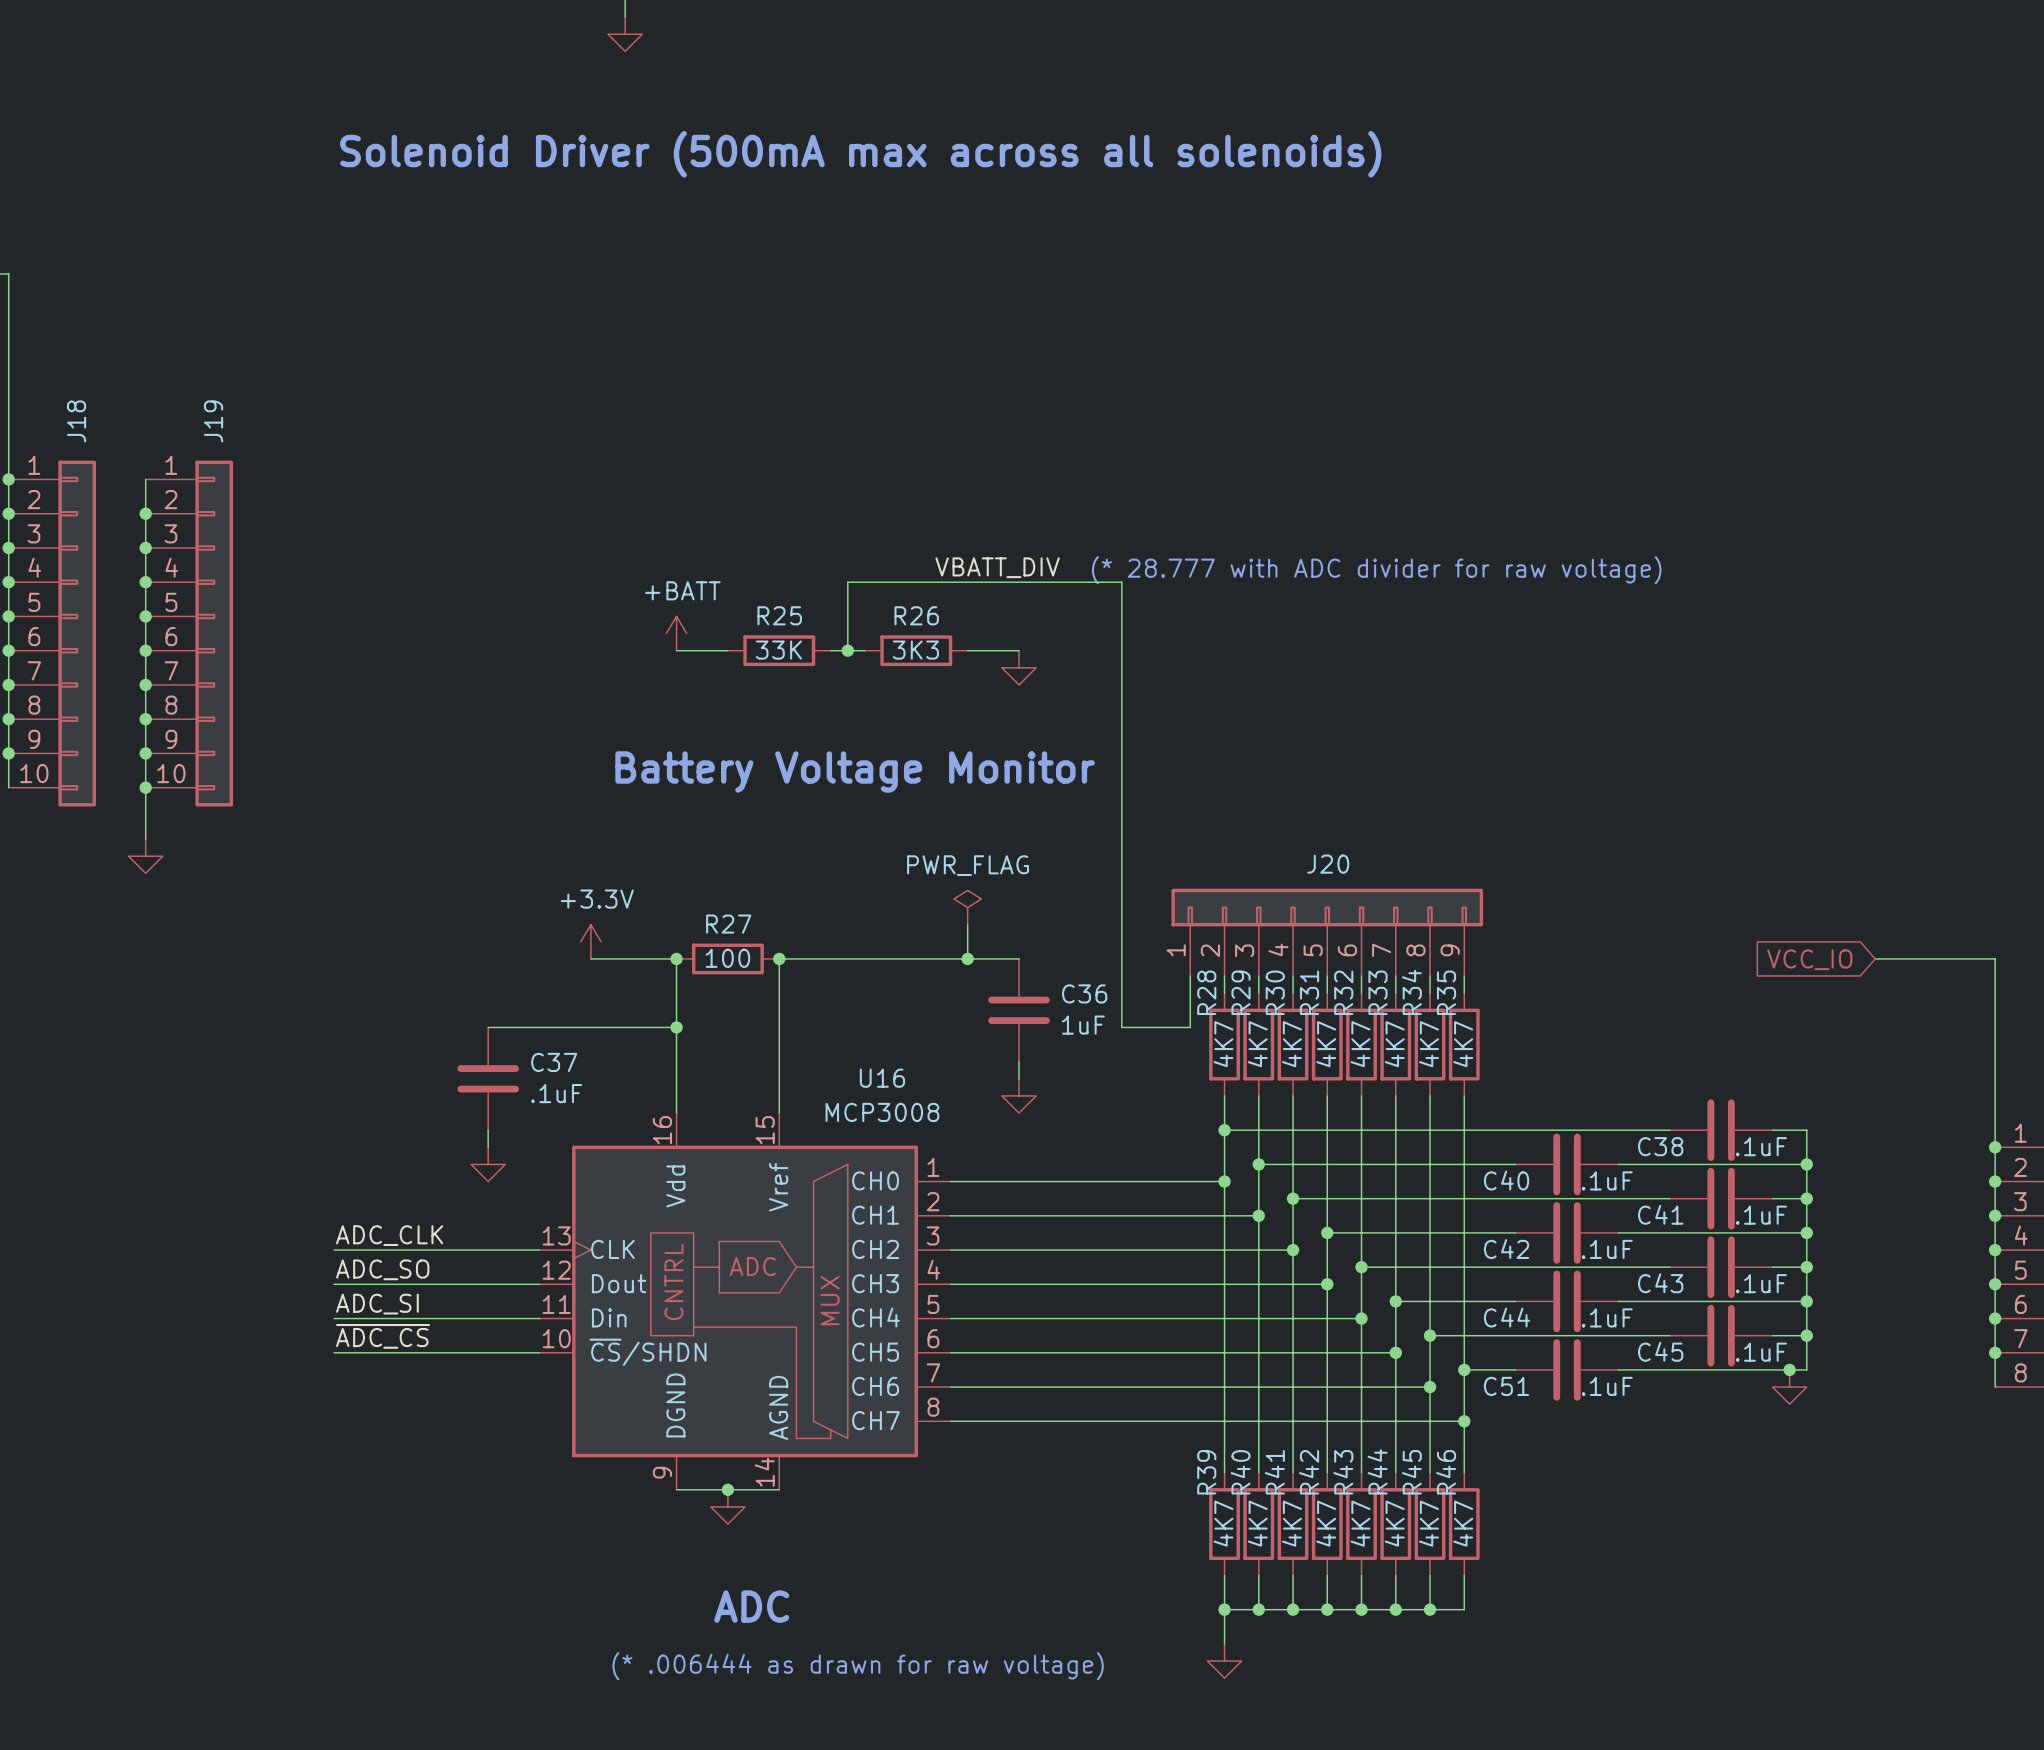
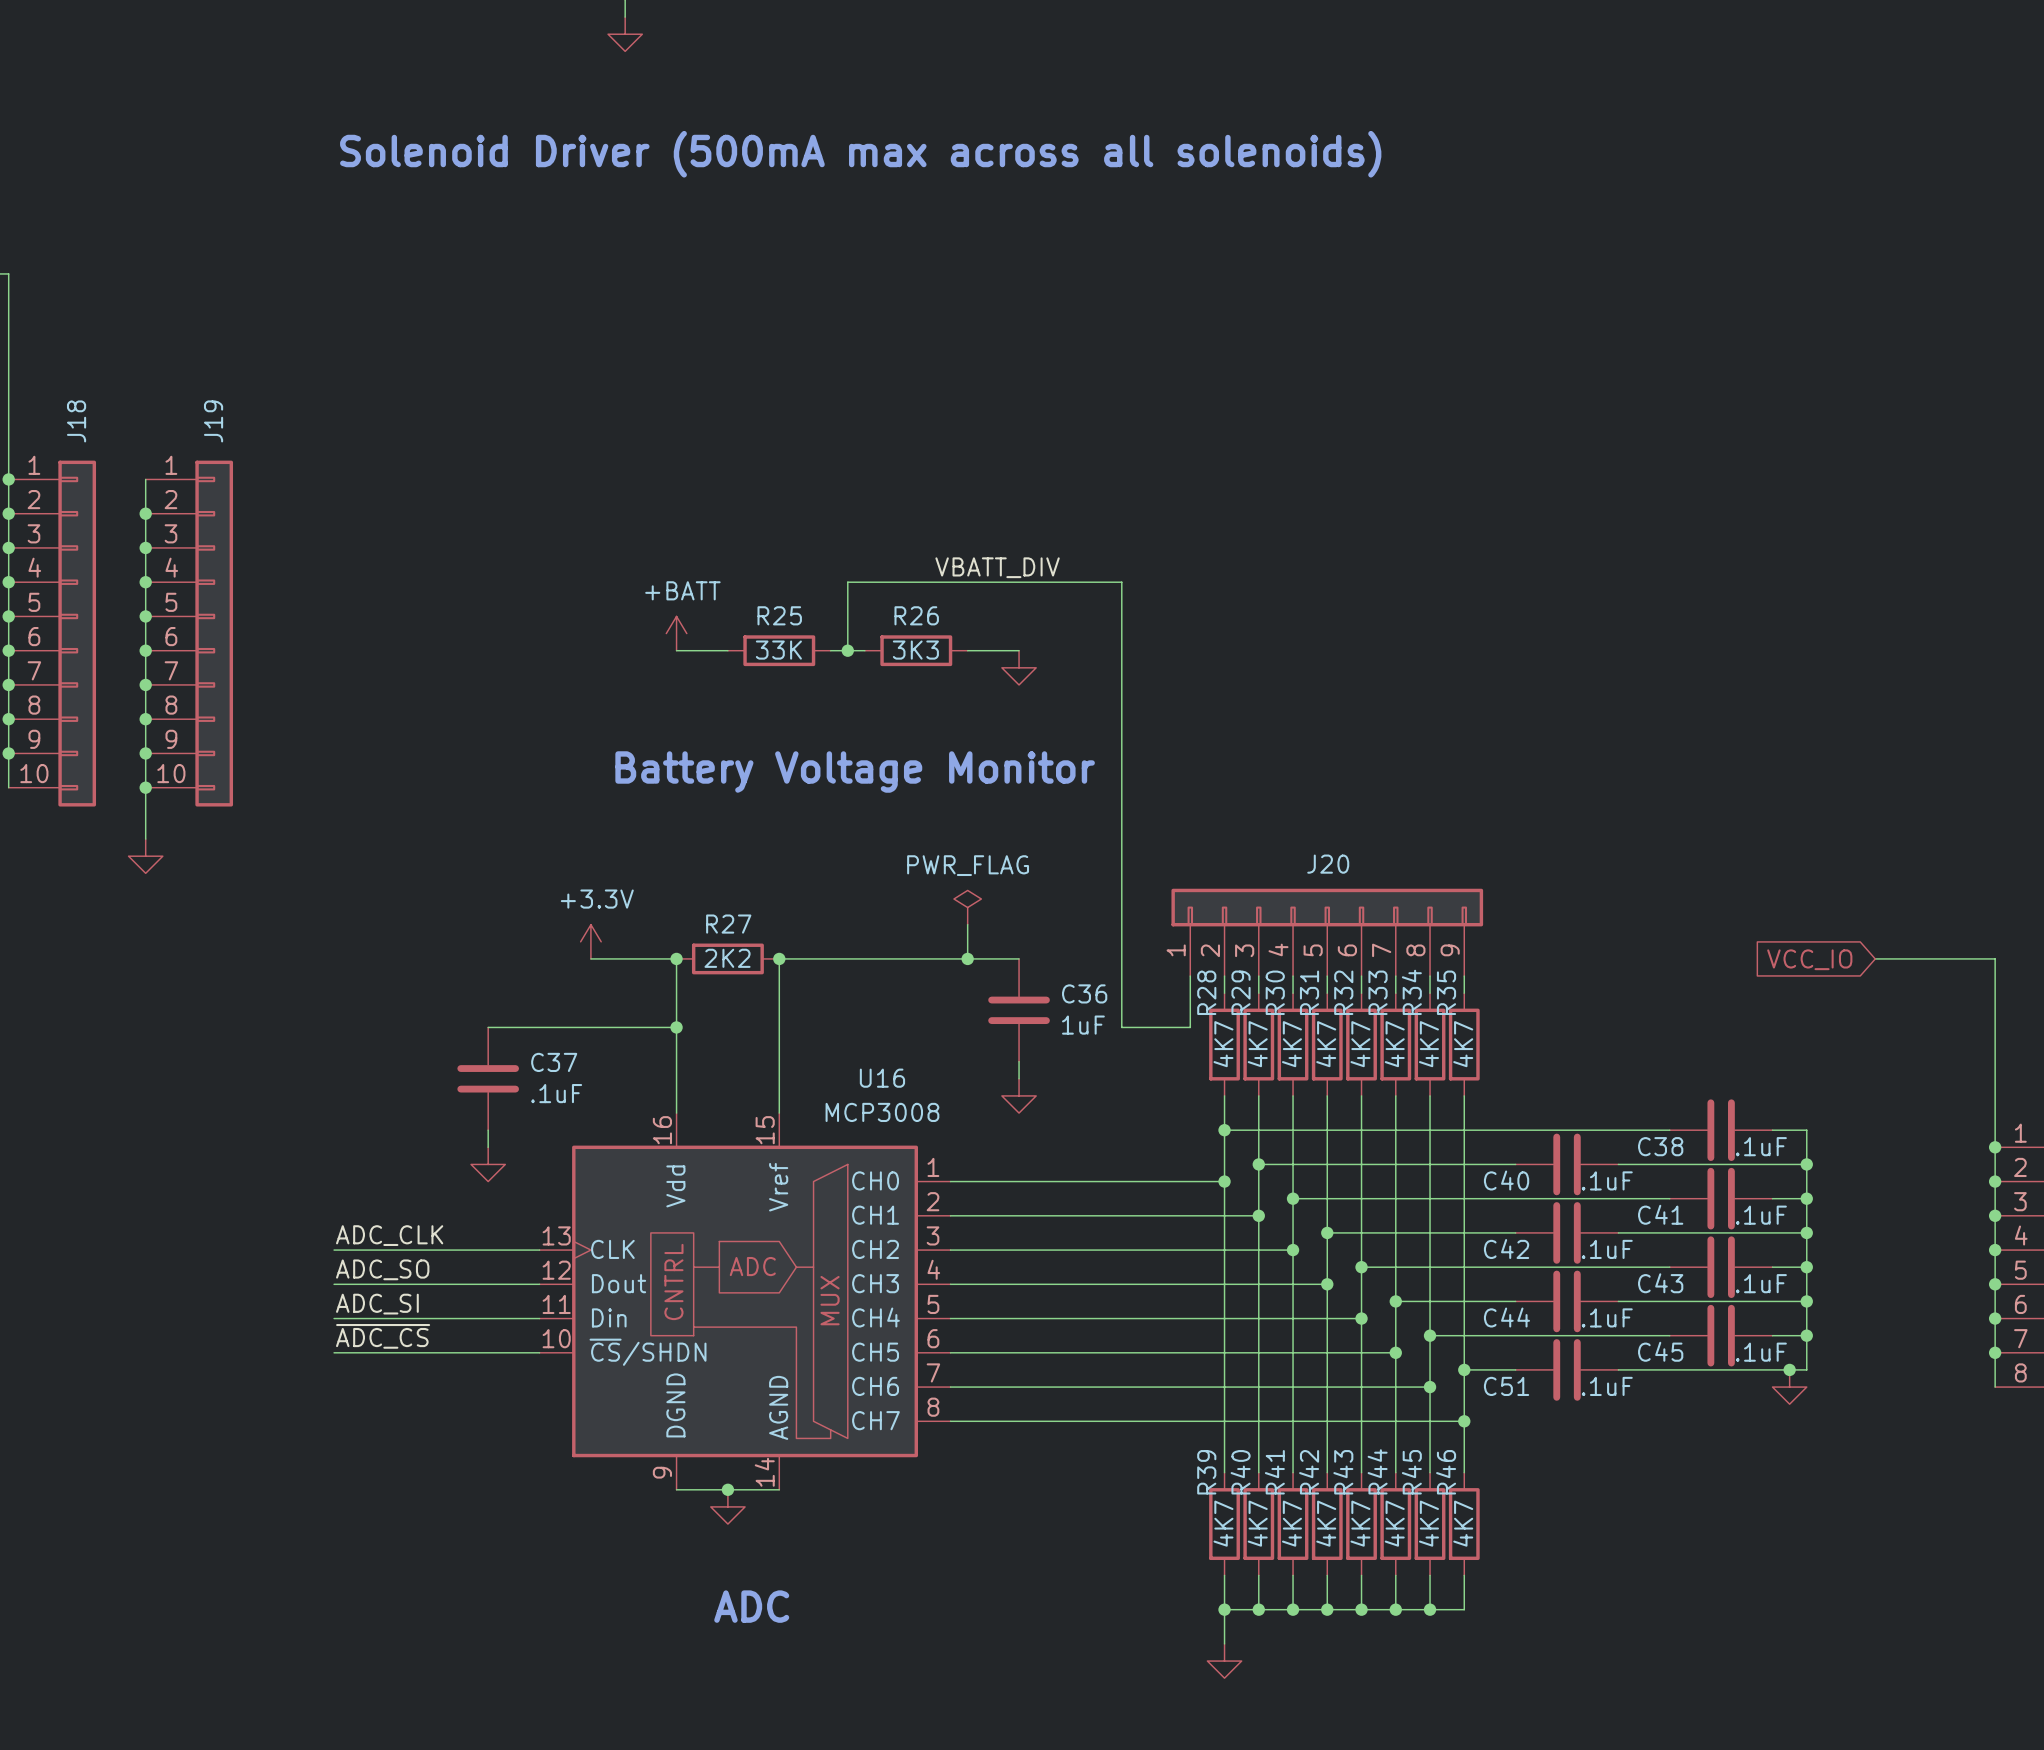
text: (* 28.777 with ADC divider for raw voltage) (1376, 570) -> none
R27 value: 100 (727, 958) -> 2K2 (727, 958)
text: (* .006444 as drawn for raw voltage) (858, 1666) -> none

